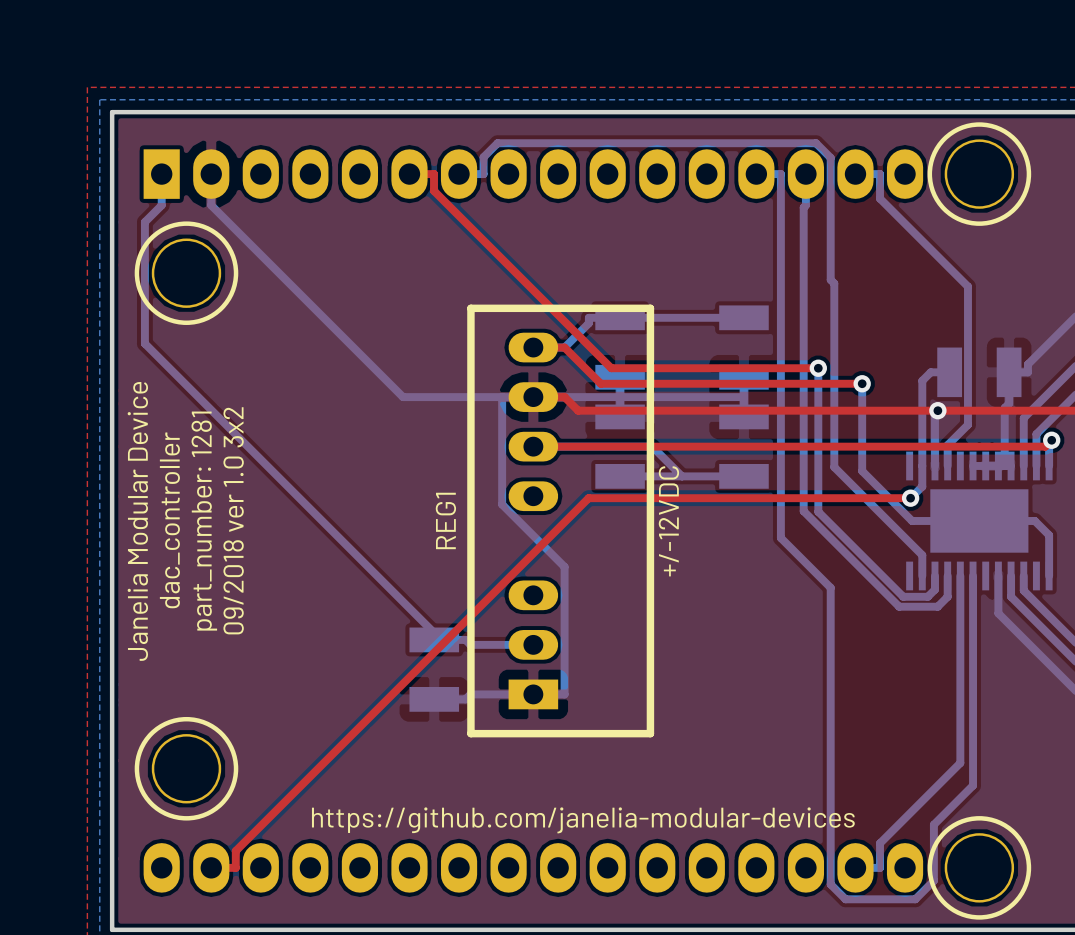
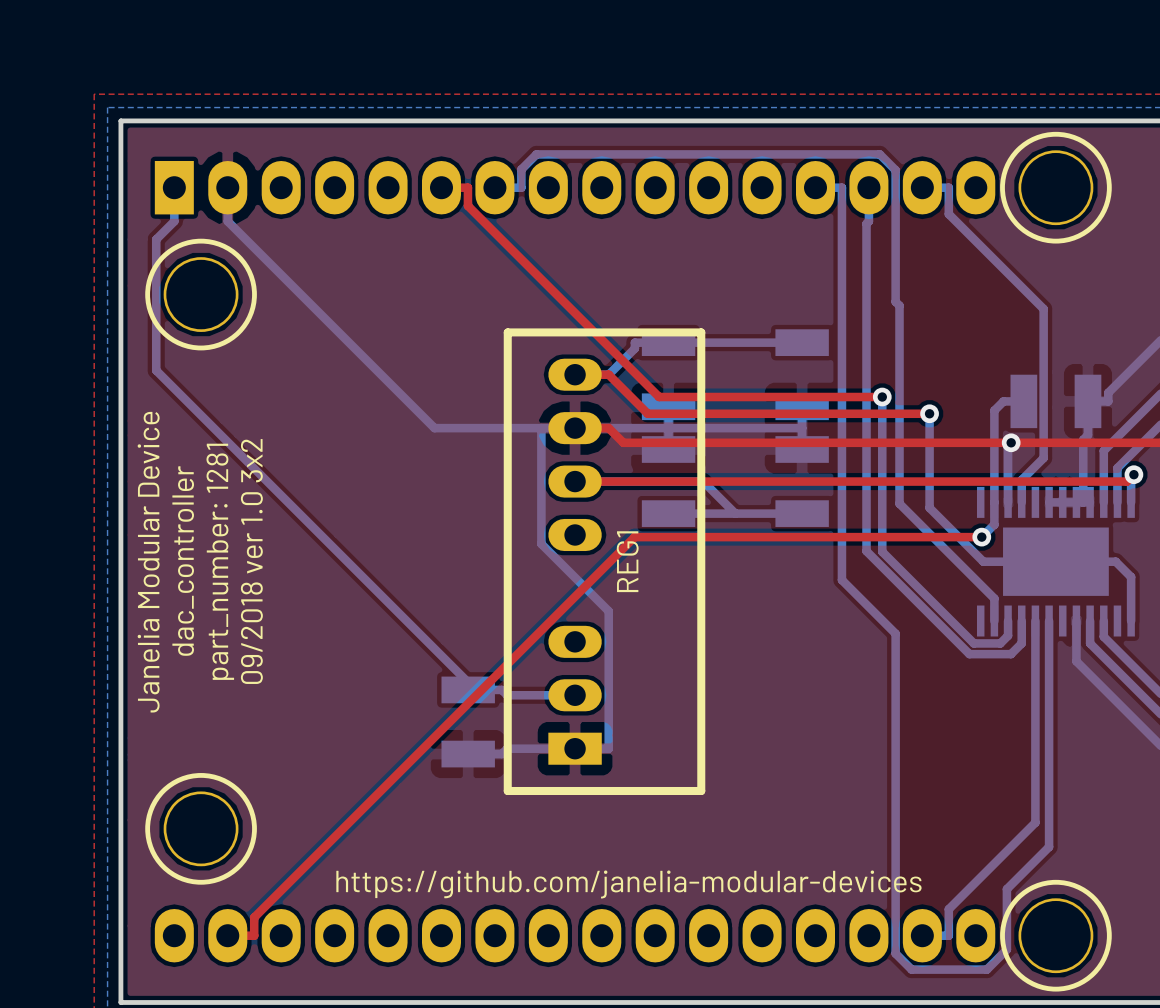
REG1 name position: REG1 (445, 520) -> REG1 (627, 561)
text: +/-12VDC (668, 521) -> none

